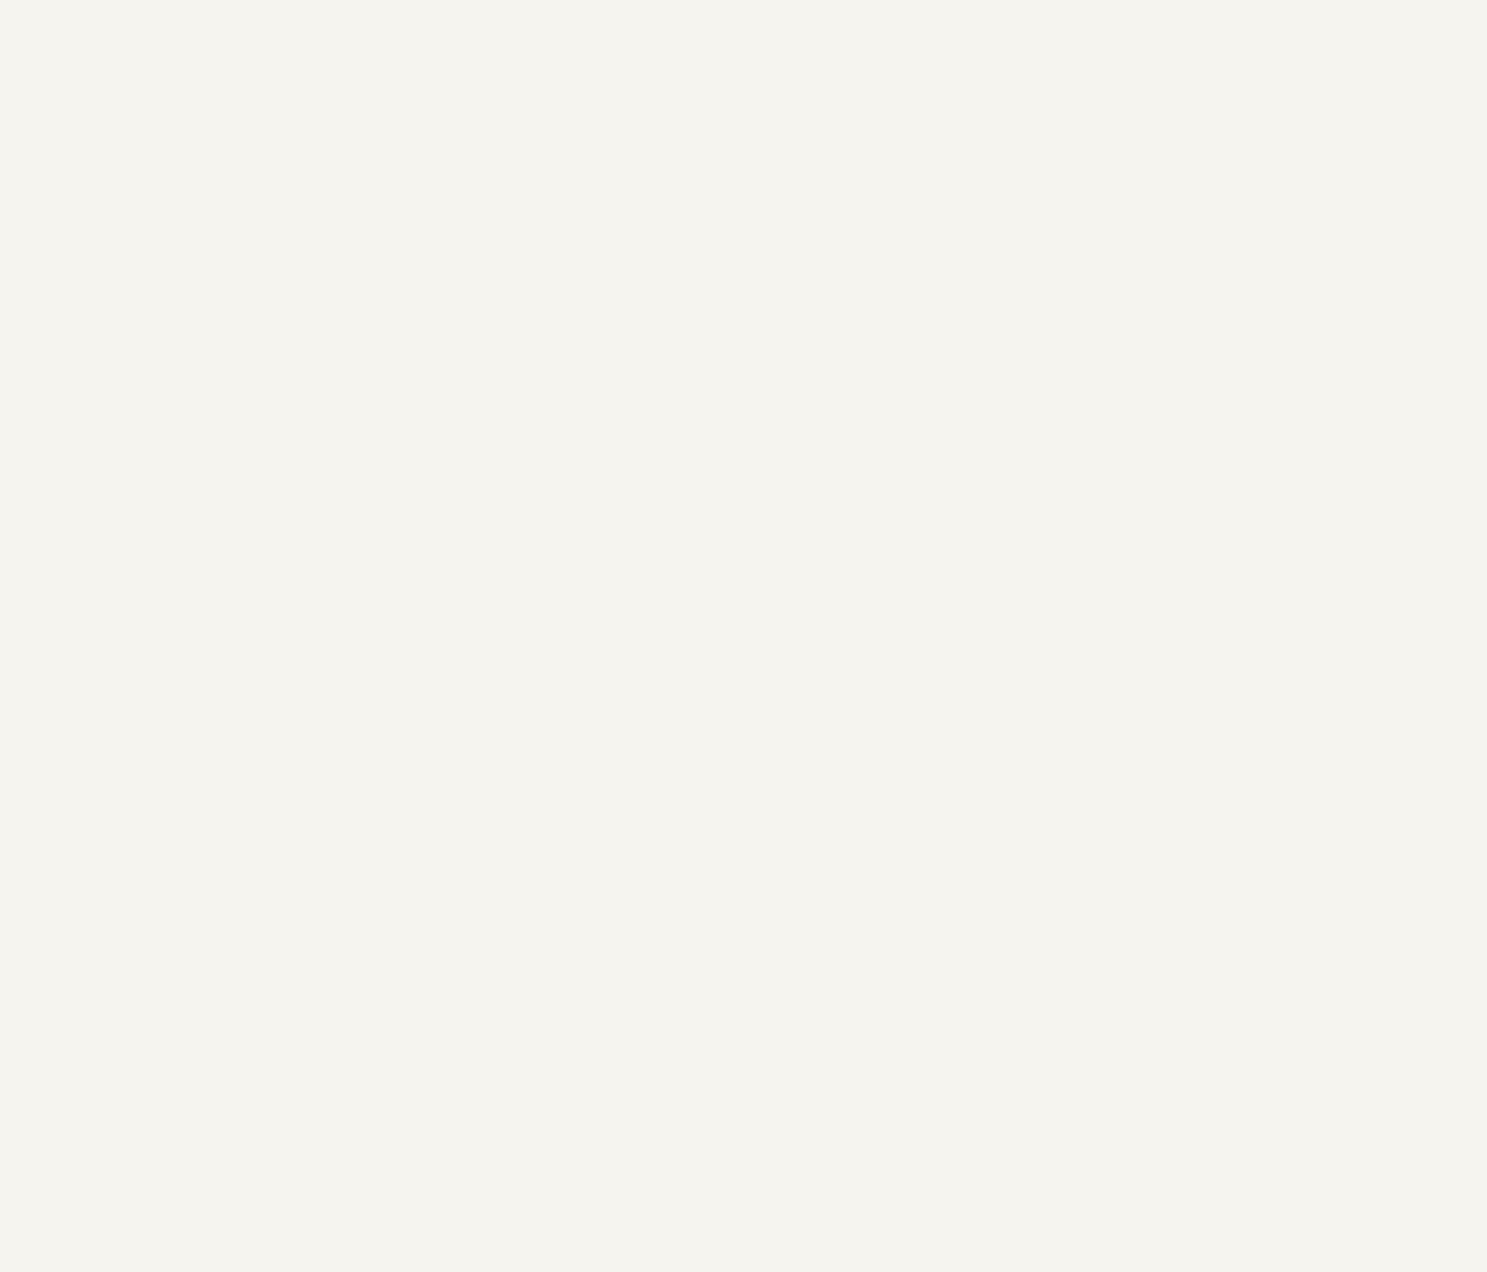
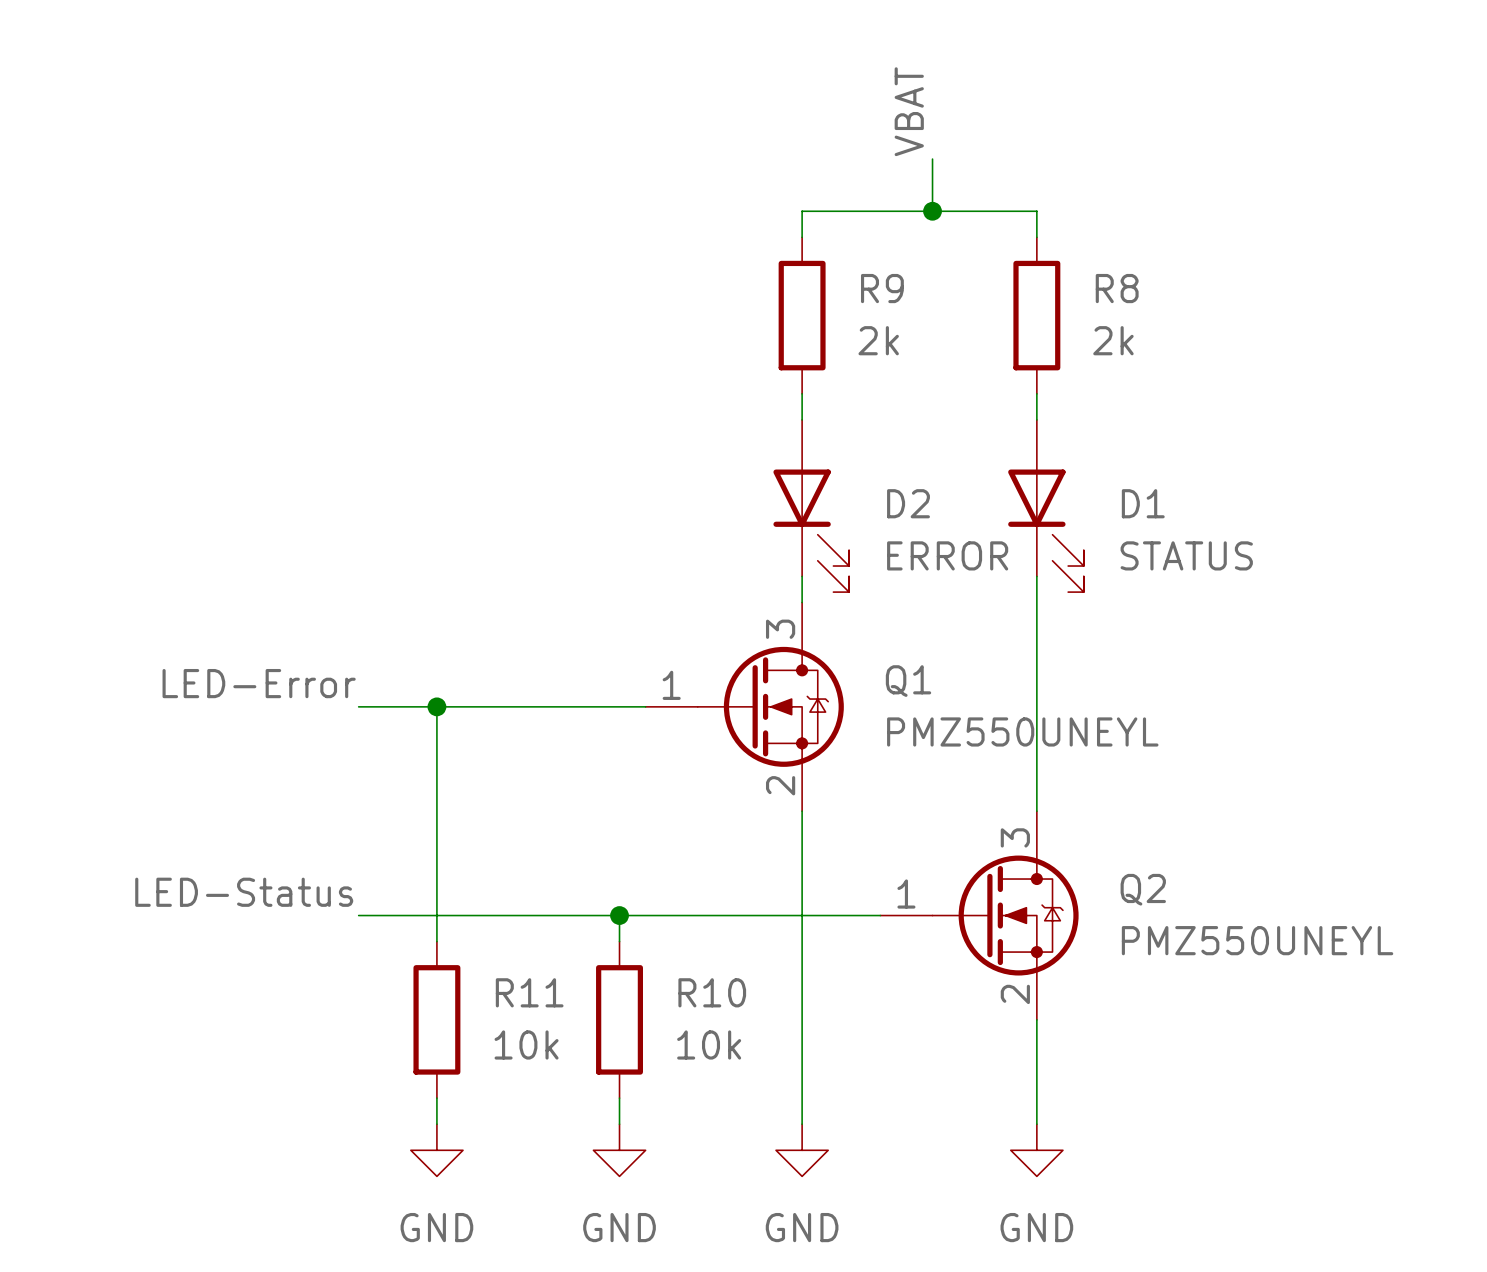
label: none -> VBAT (909, 111)
wire: none -> (932, 159) (932, 211)
junction: none -> (932, 211)
wire: none -> (802, 237) (802, 211) (1036, 211) (1036, 237)
R9: none -> 2k (802, 315)
R8: none -> 2k (1036, 315)
wire: none -> (802, 393) (802, 419)
wire: none -> (1036, 393) (1036, 419)
D2: none -> ERROR (811, 506)
D1: none -> STATUS (1045, 506)
wire: none -> (802, 576) (802, 602)
wire: none -> (1036, 576) (1036, 811)
label: none -> LED-Error (259, 683)
wire: none -> (358, 706) (645, 706)
wire: none -> (436, 706) (436, 941)
junction: none -> (436, 706)
Q1: none -> PMZ550UNEYL (744, 706)
wire: none -> (802, 811) (802, 1124)
label: none -> LED-Status (244, 892)
wire: none -> (358, 915) (880, 915)
wire: none -> (619, 915) (619, 941)
junction: none -> (619, 915)
Q2: none -> PMZ550UNEYL (979, 915)
R11: none -> 10k (436, 1019)
R10: none -> 10k (619, 1019)
wire: none -> (1036, 1019) (1036, 1124)
wire: none -> (436, 1098) (436, 1124)
wire: none -> (619, 1098) (619, 1124)
power symbol: none -> GND (436, 1150)
power symbol: none -> GND (619, 1150)
power symbol: none -> GND (802, 1150)
power symbol: none -> GND (1036, 1150)

